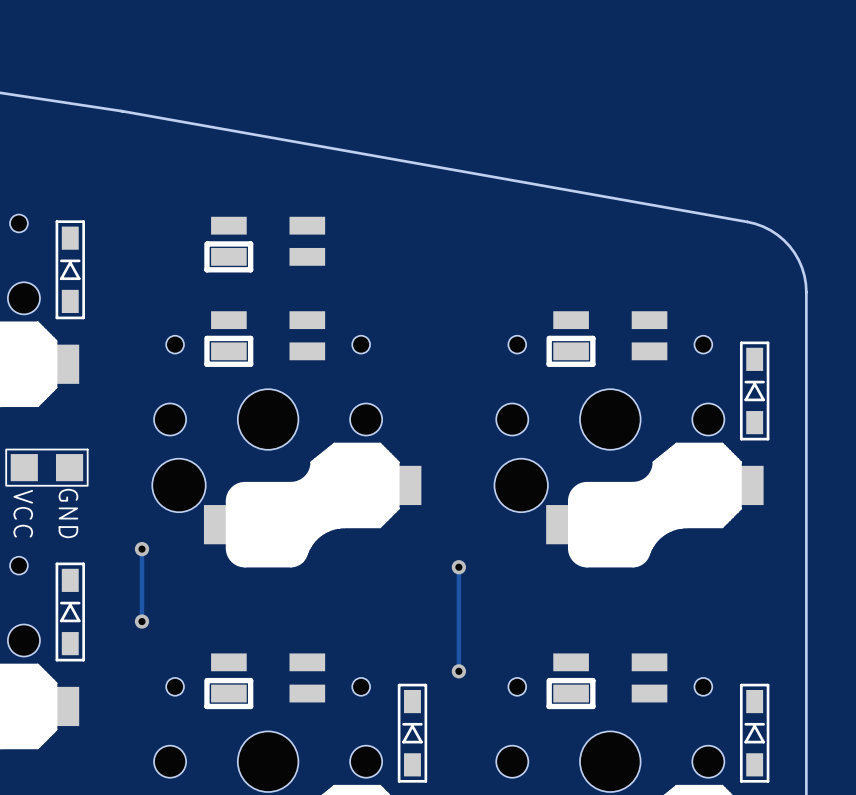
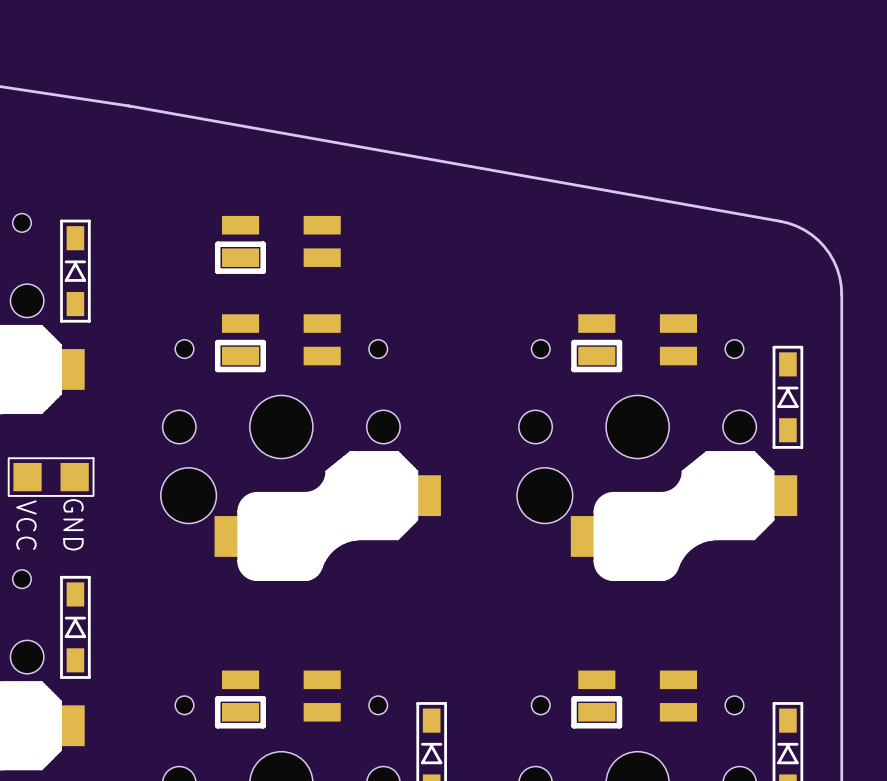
track: (141, 549) (141, 621) -> none
via: (141, 549) -> none
track: (458, 567) (458, 671) -> none
via: (458, 567) -> none
via: (141, 621) -> none
via: (458, 671) -> none

